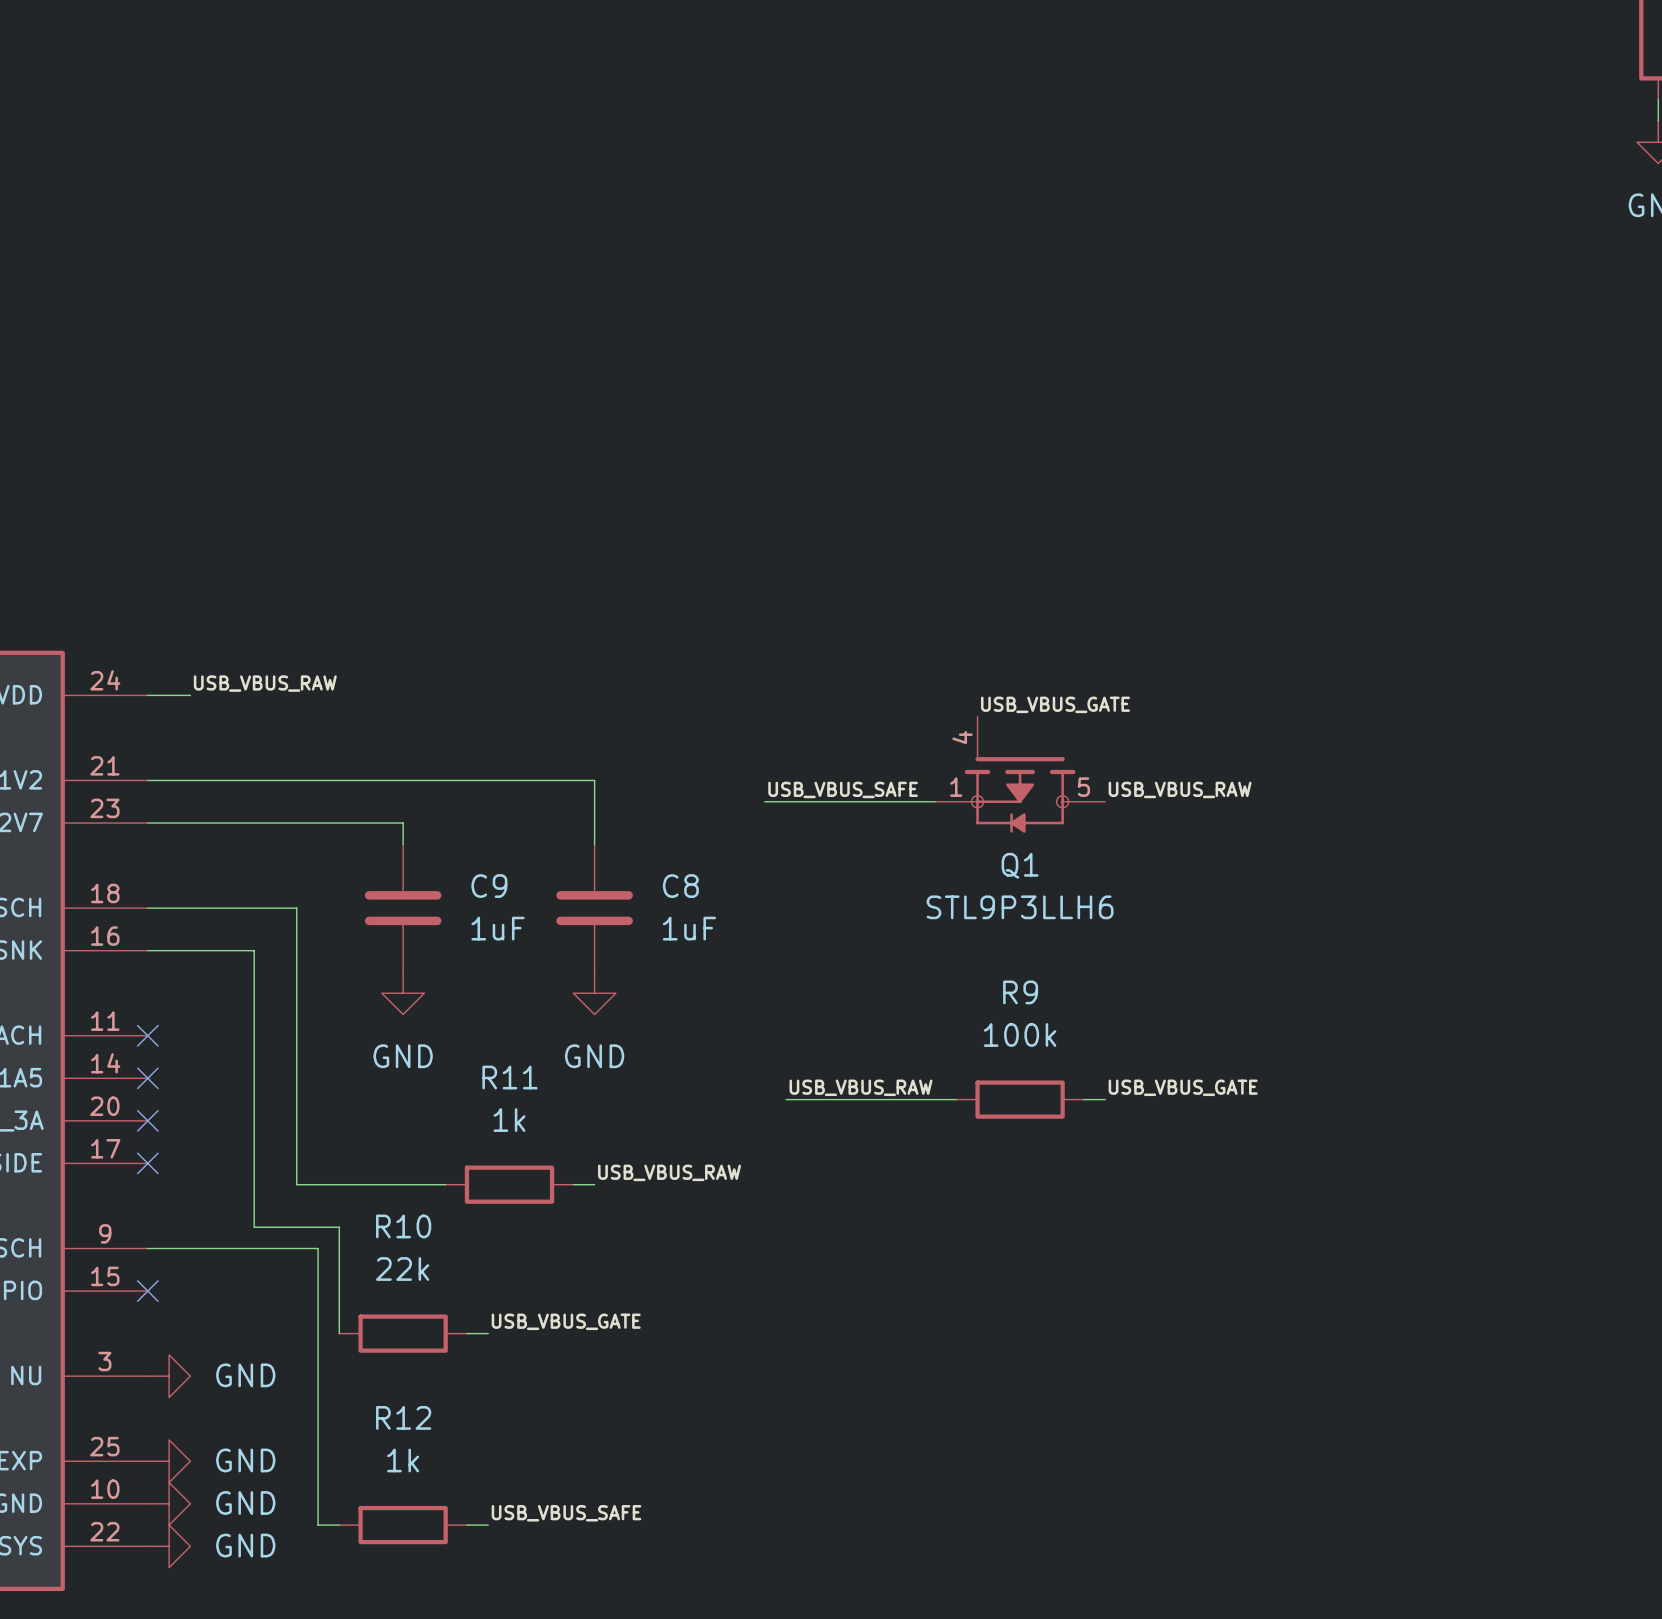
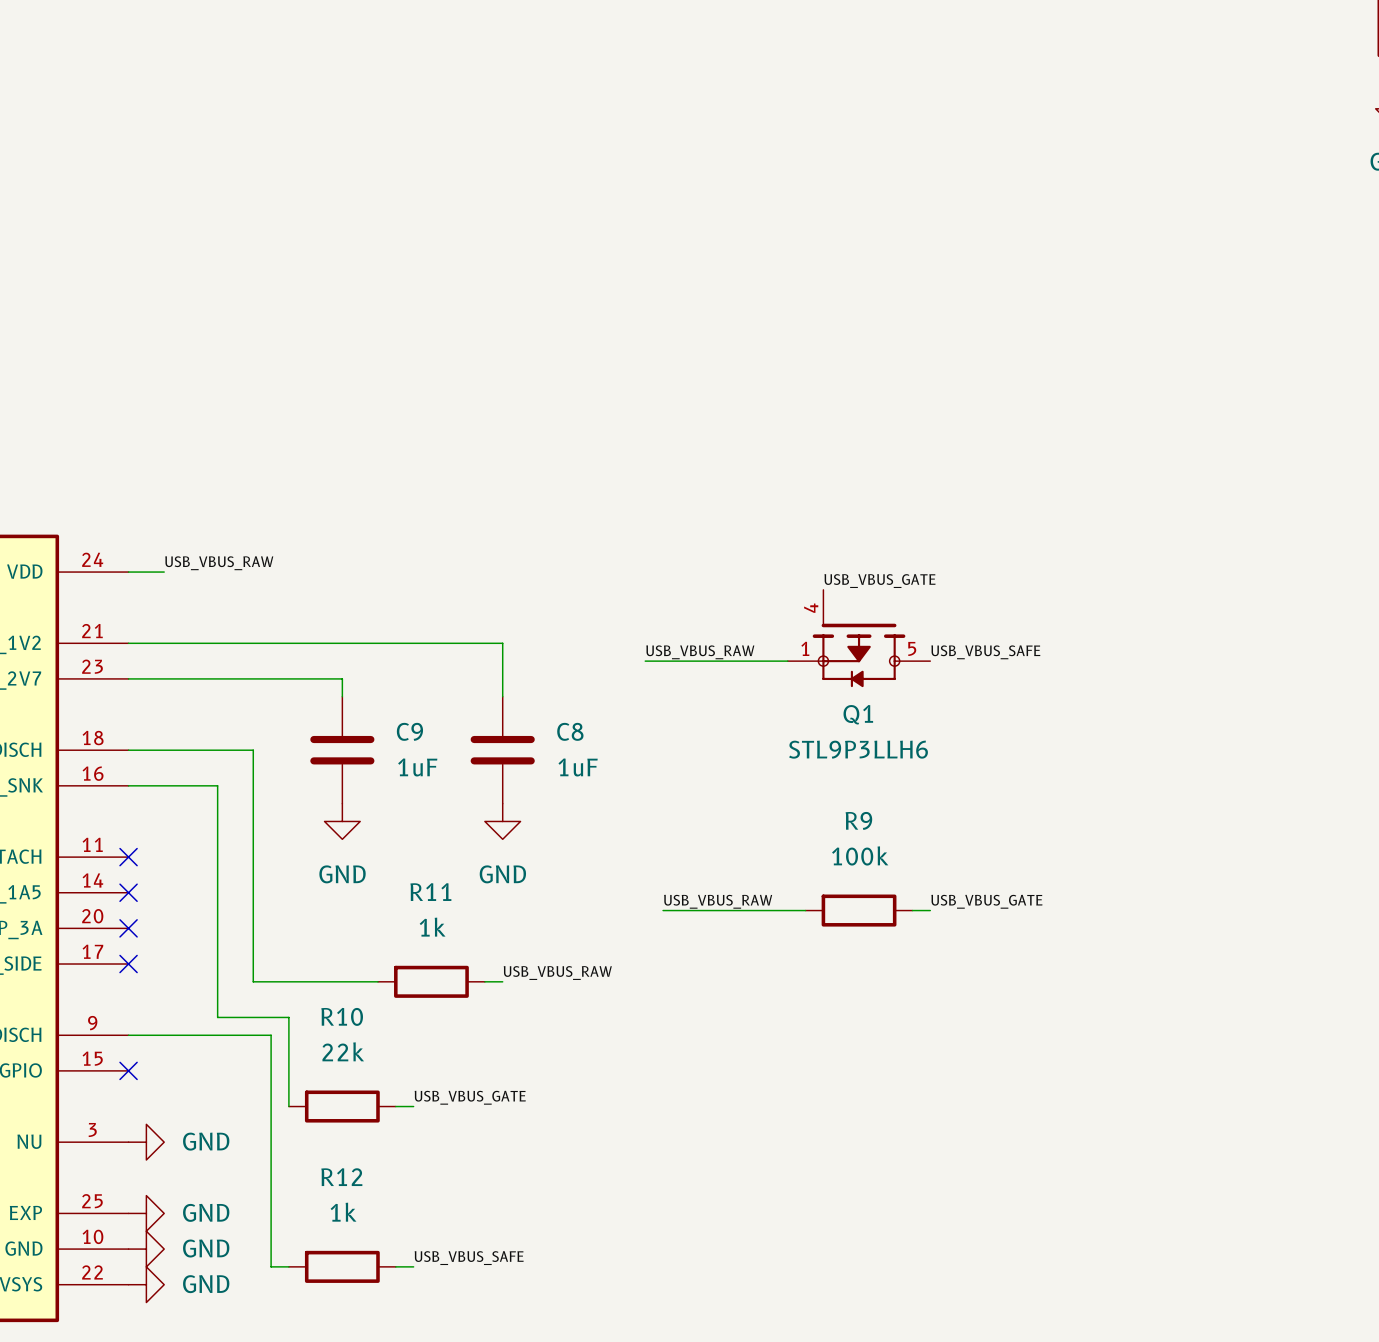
label: USB_VBUS_SAFE (843, 789) -> USB_VBUS_RAW (700, 652)
label: USB_VBUS_RAW (1180, 789) -> USB_VBUS_SAFE (985, 652)

